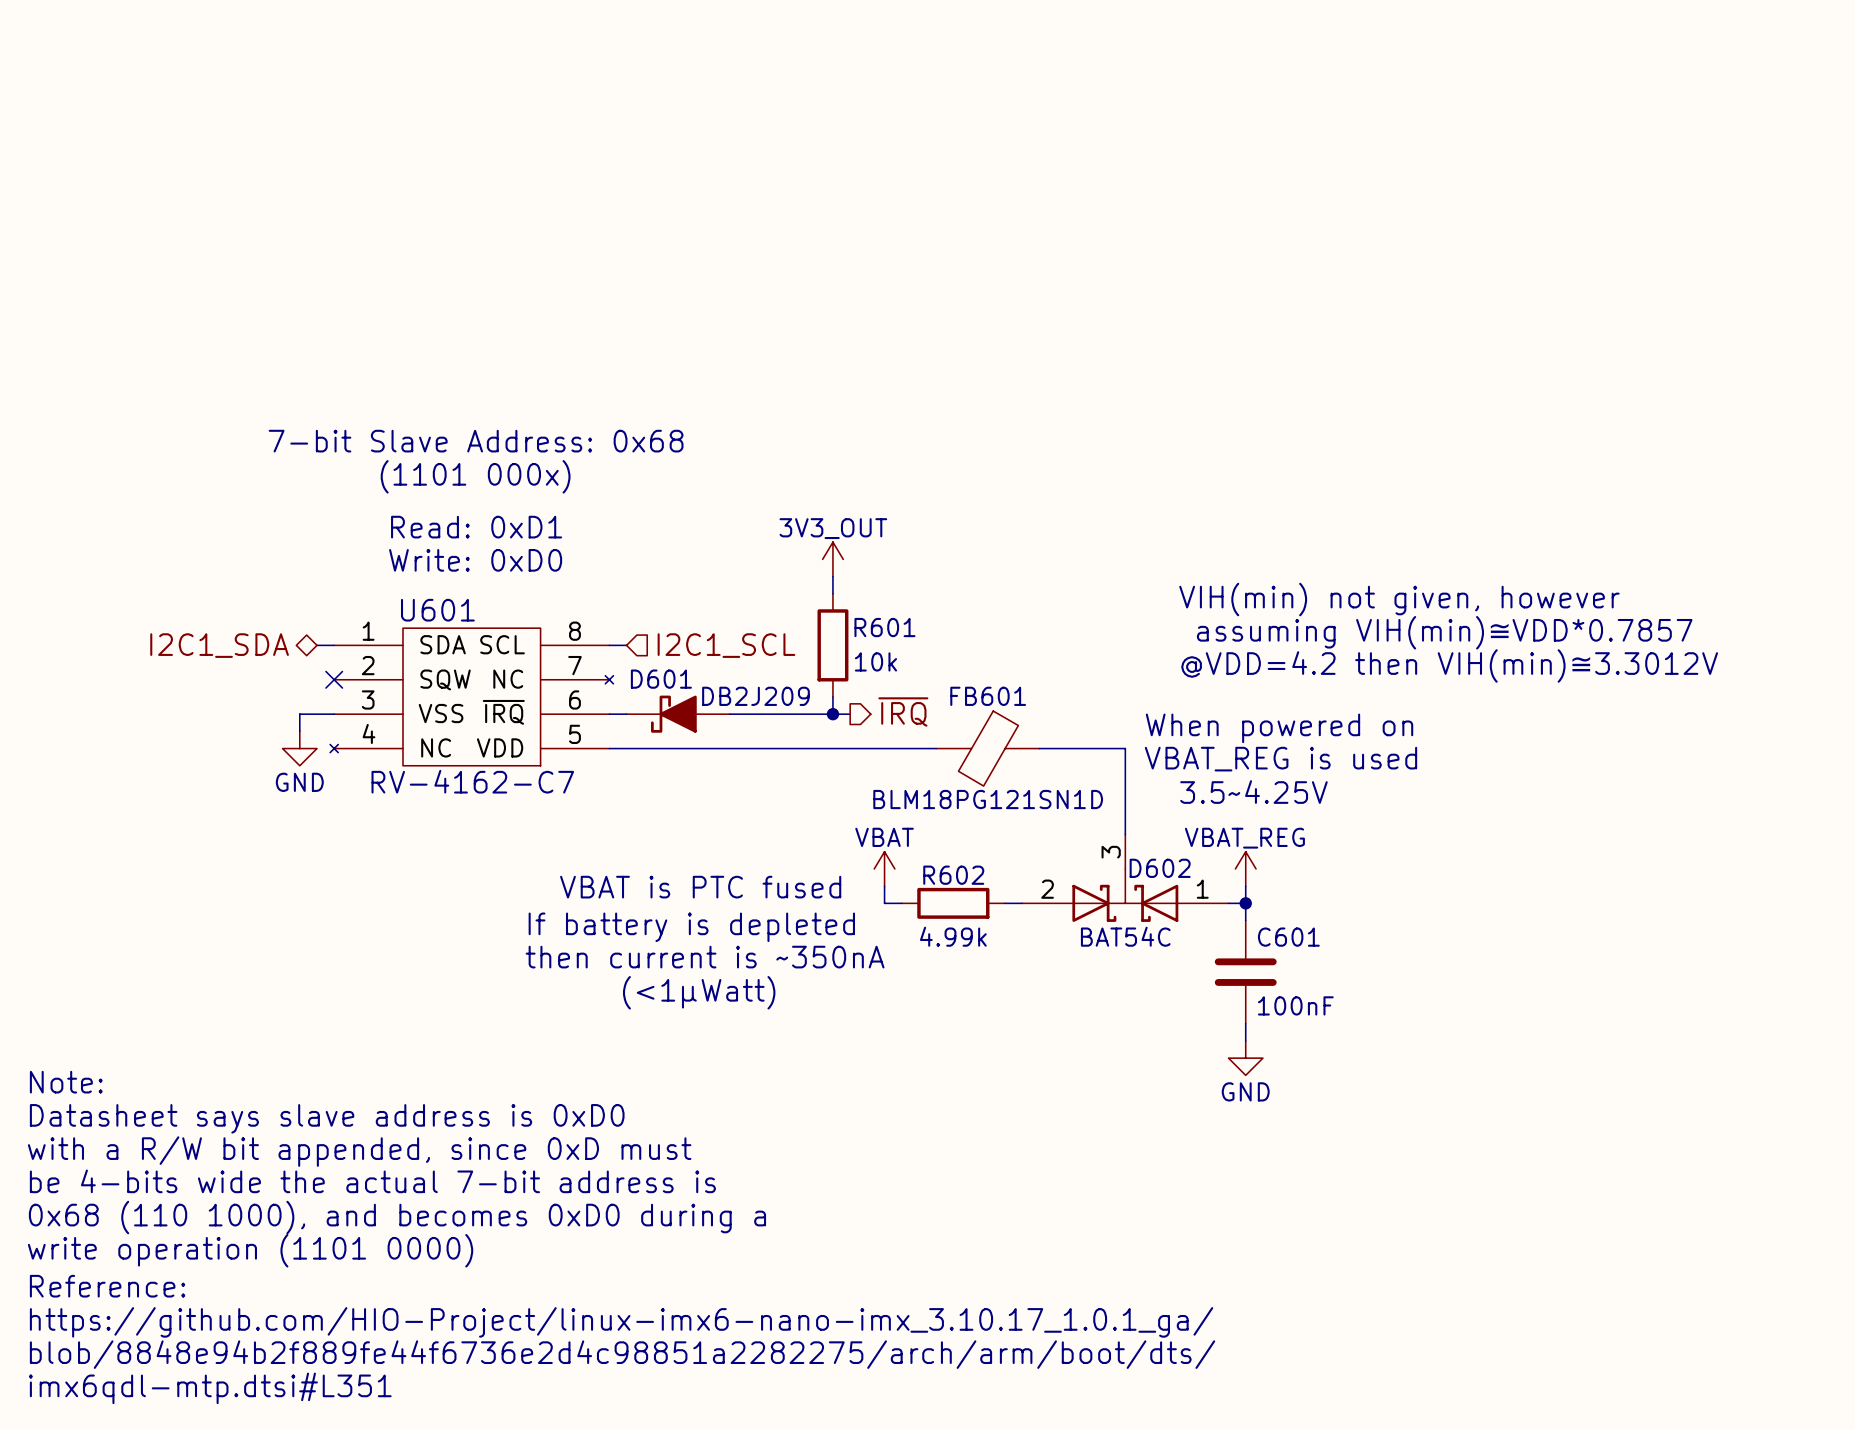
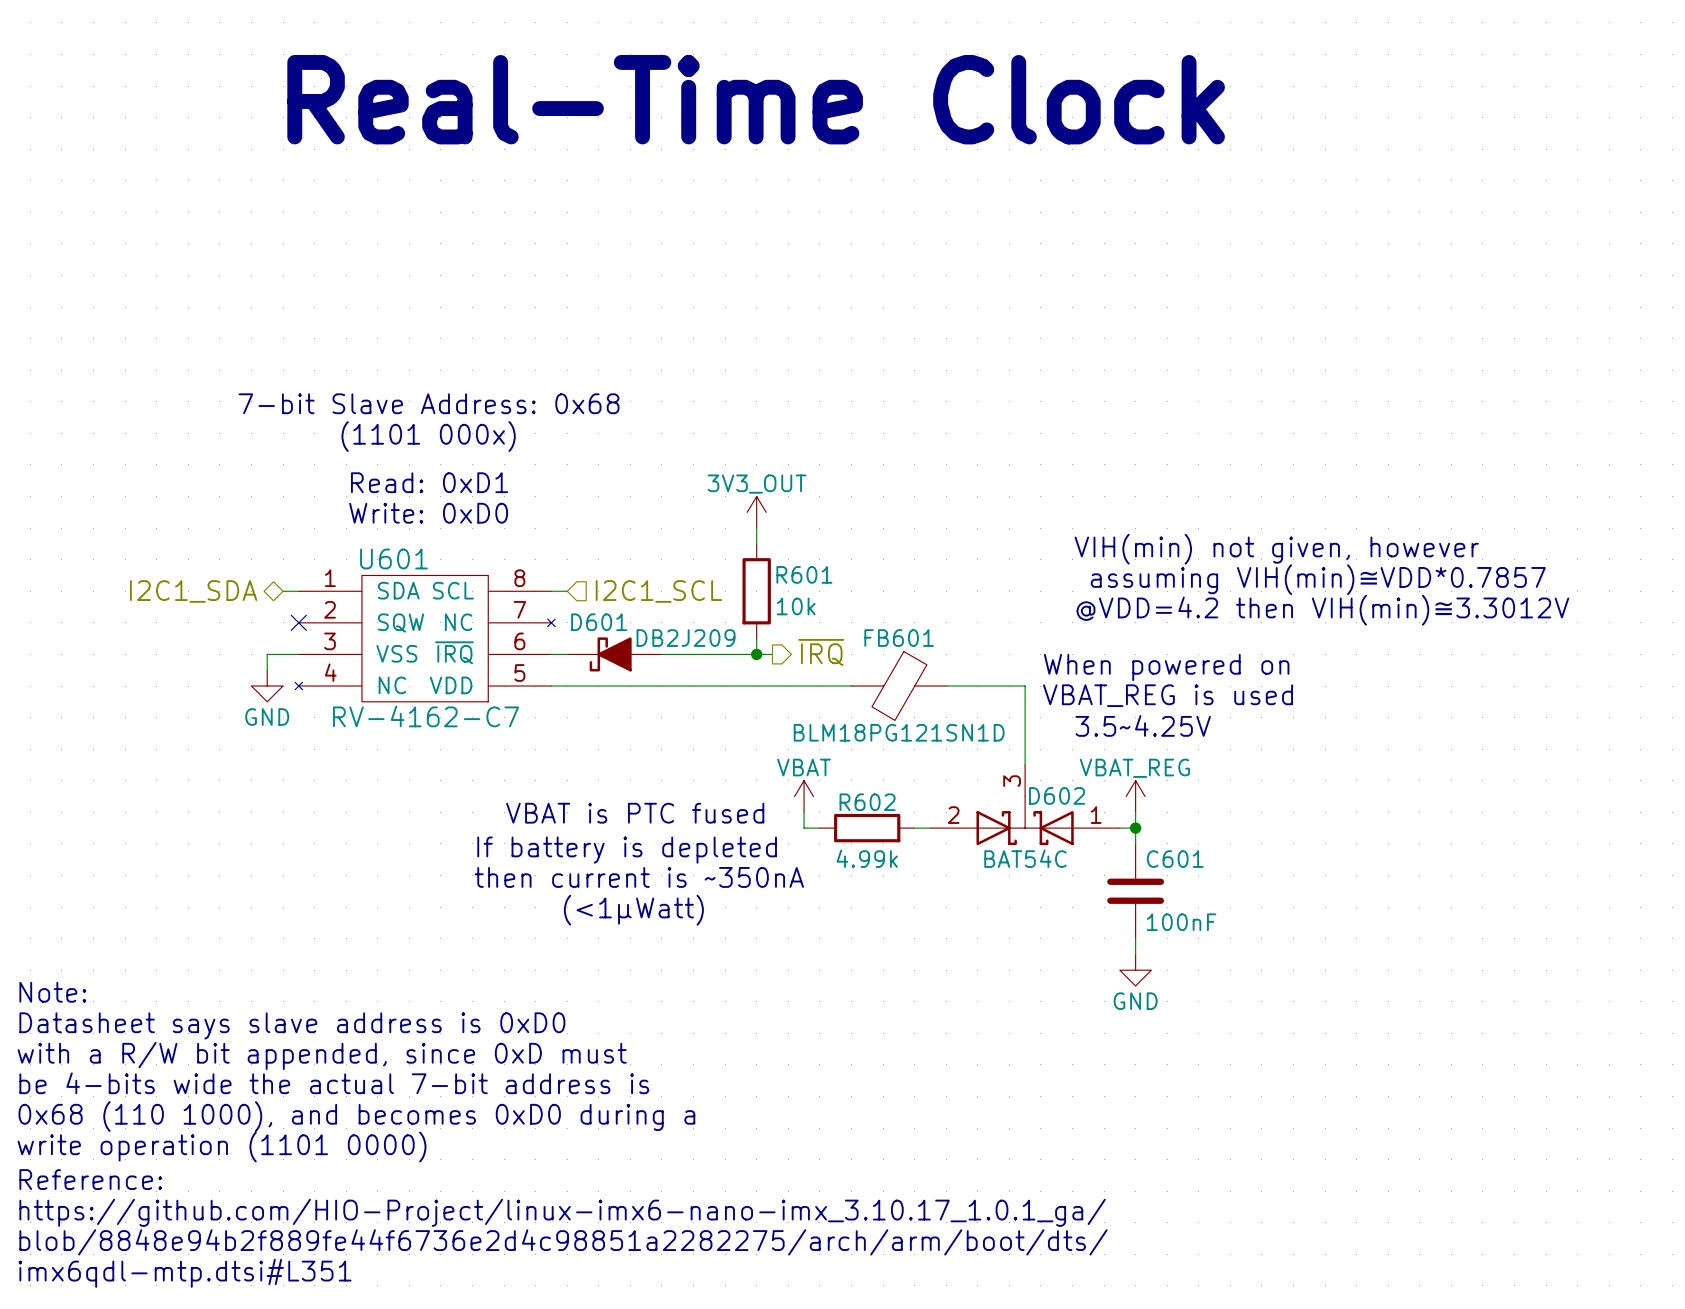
text: none -> Real-Time Clock (756, 99)

